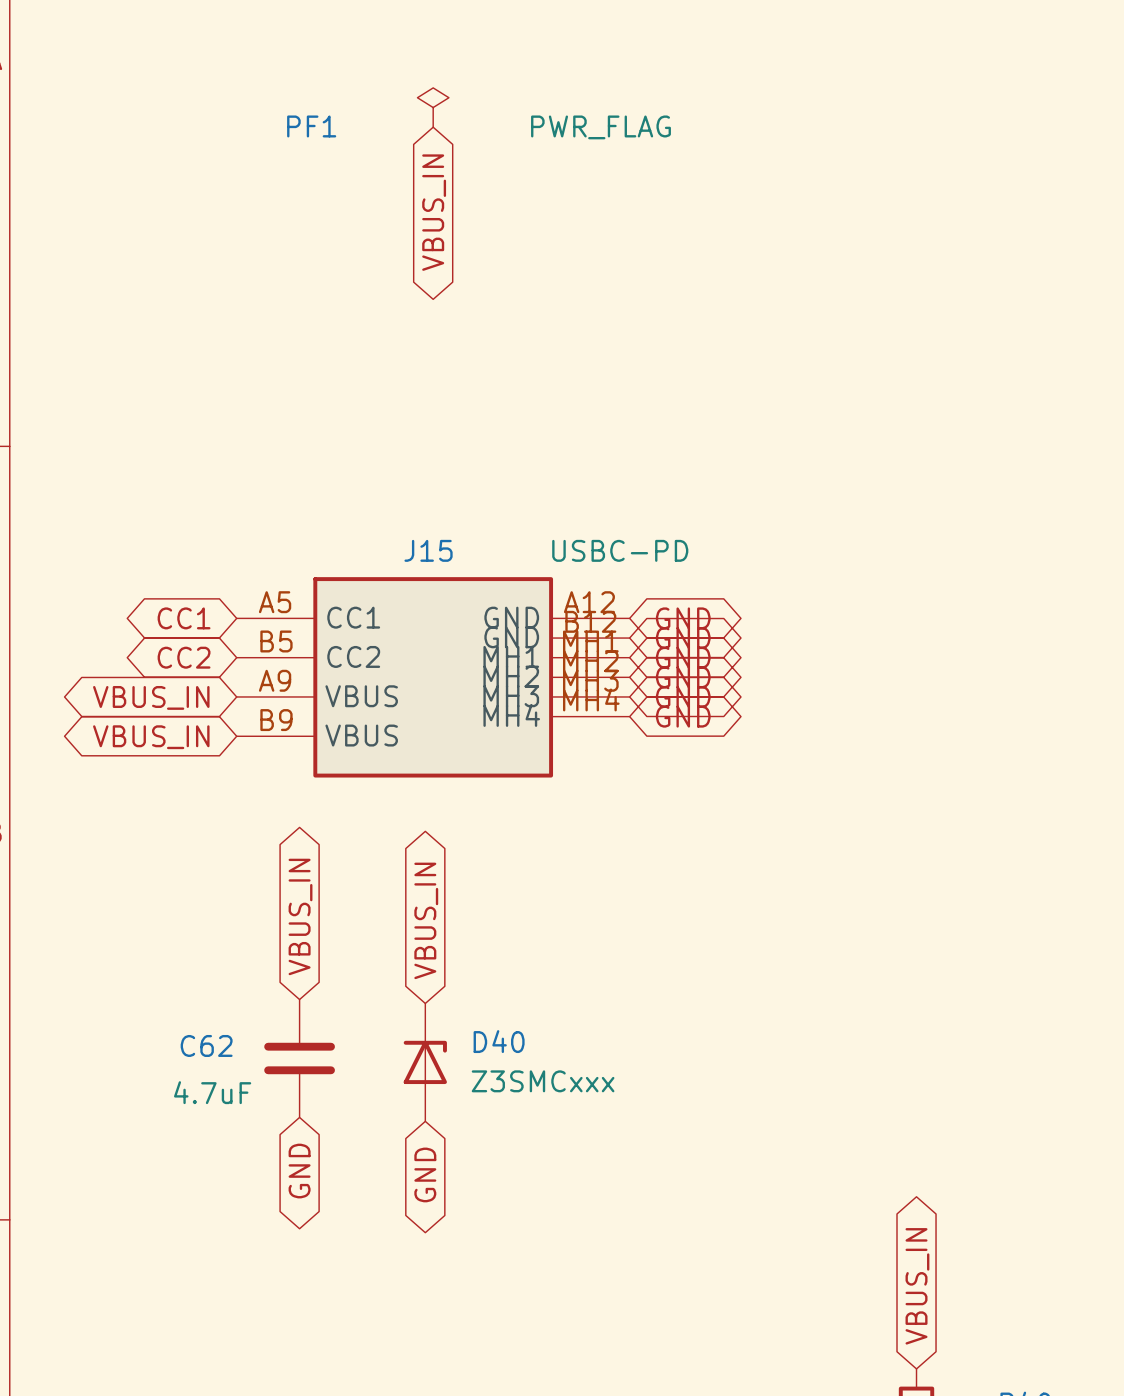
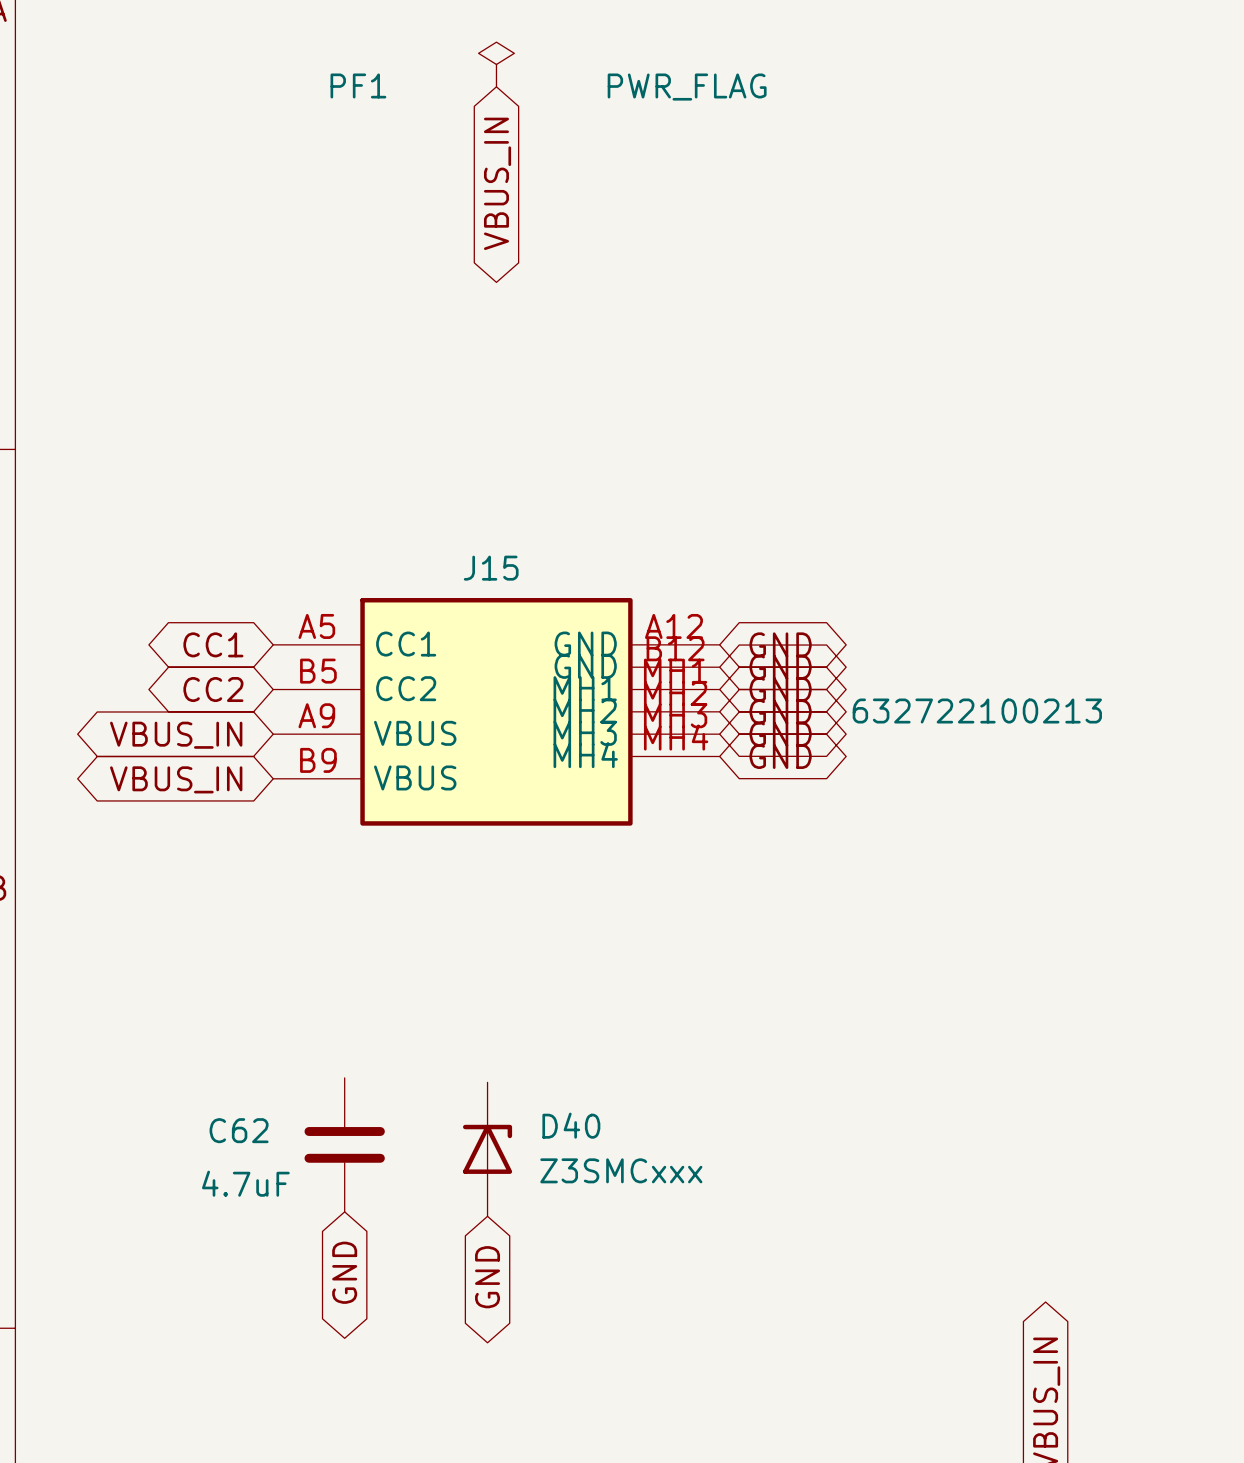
J15 value: USBC-PD (620, 550) -> 632722100213 (977, 711)
global label: VBUS_IN (300, 916) -> none
global label: VBUS_IN (426, 920) -> none

